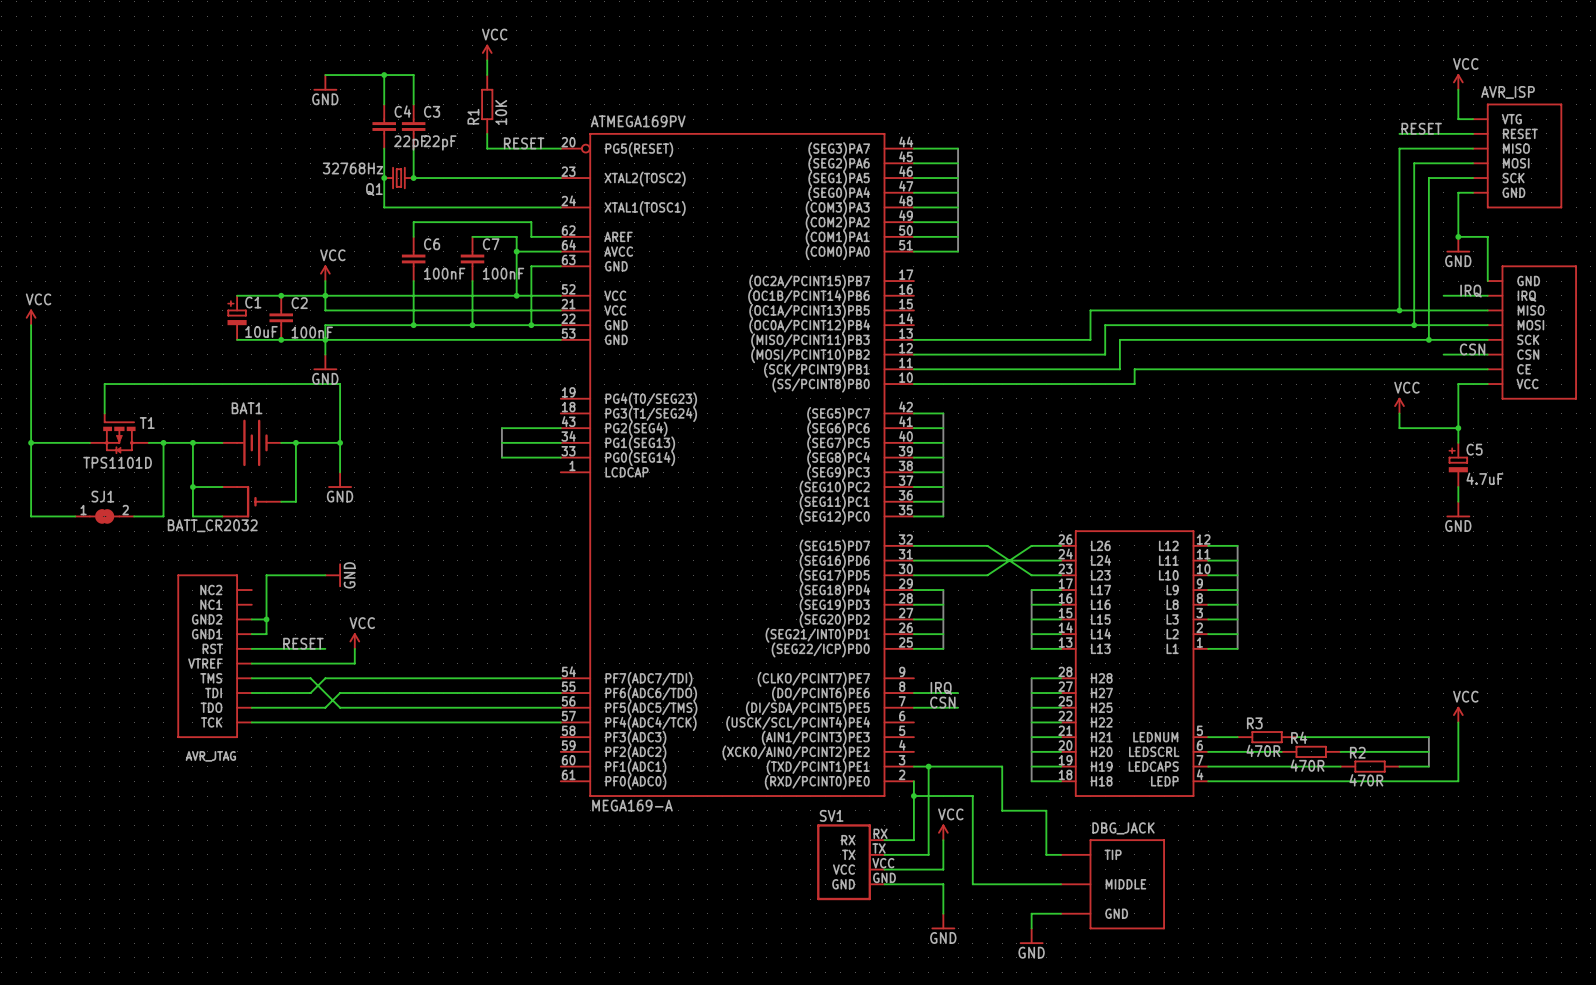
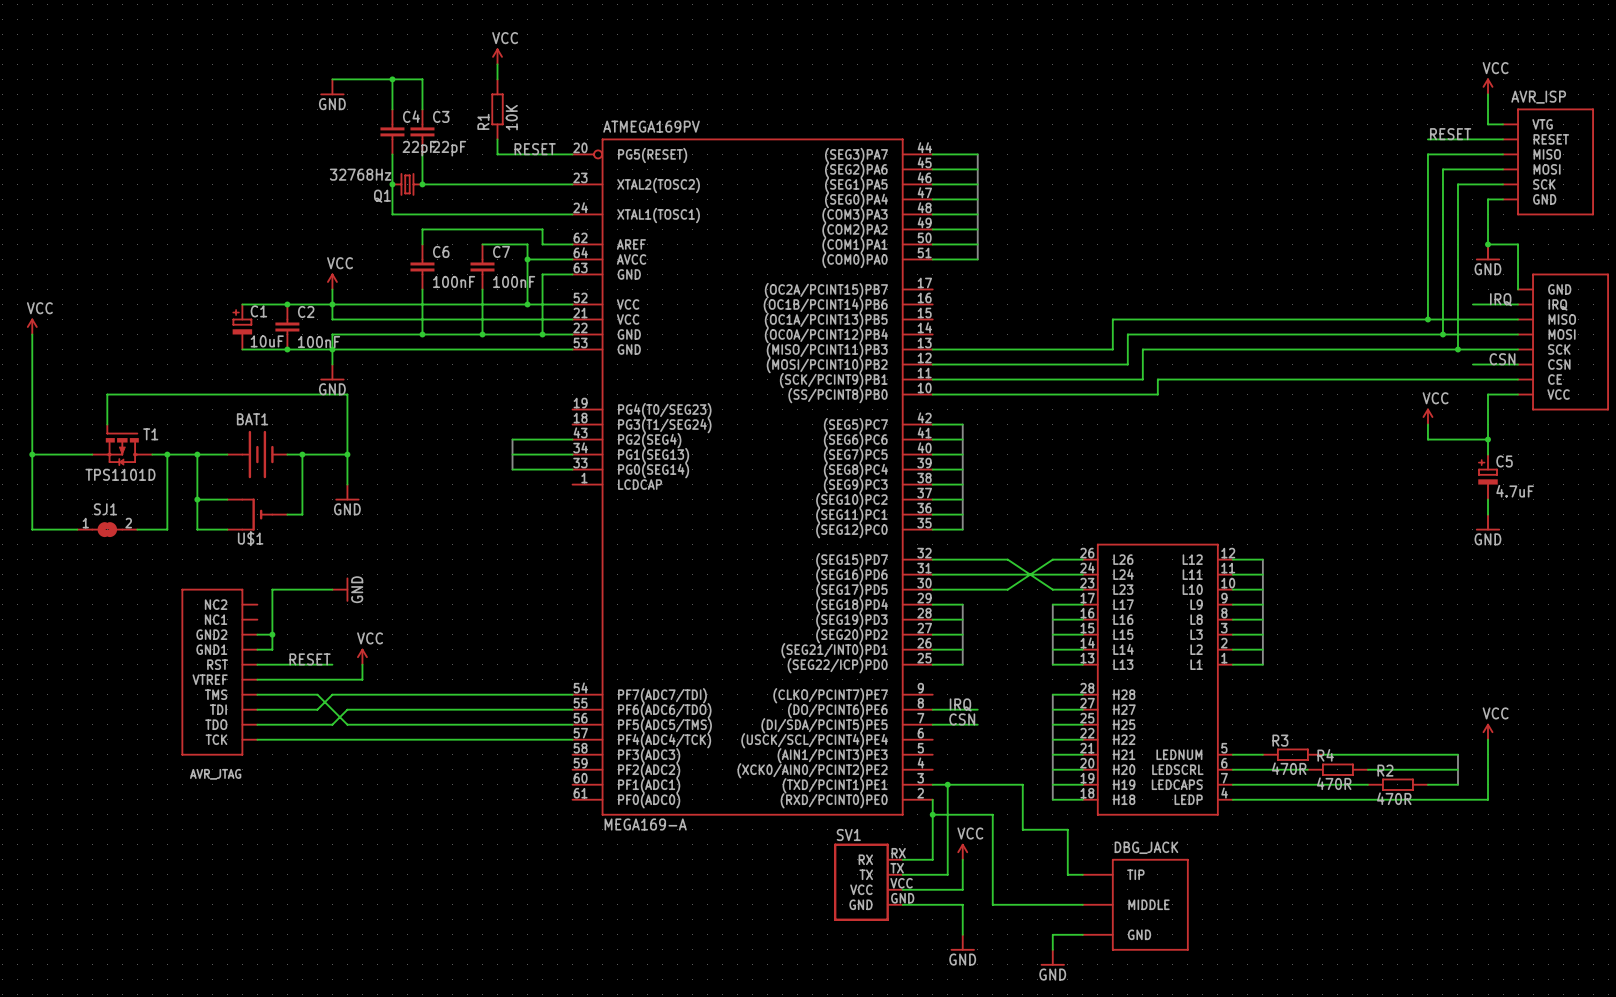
BATT_CR2032 name: BATT_CR2032 (212, 525) -> U$1 (250, 538)

